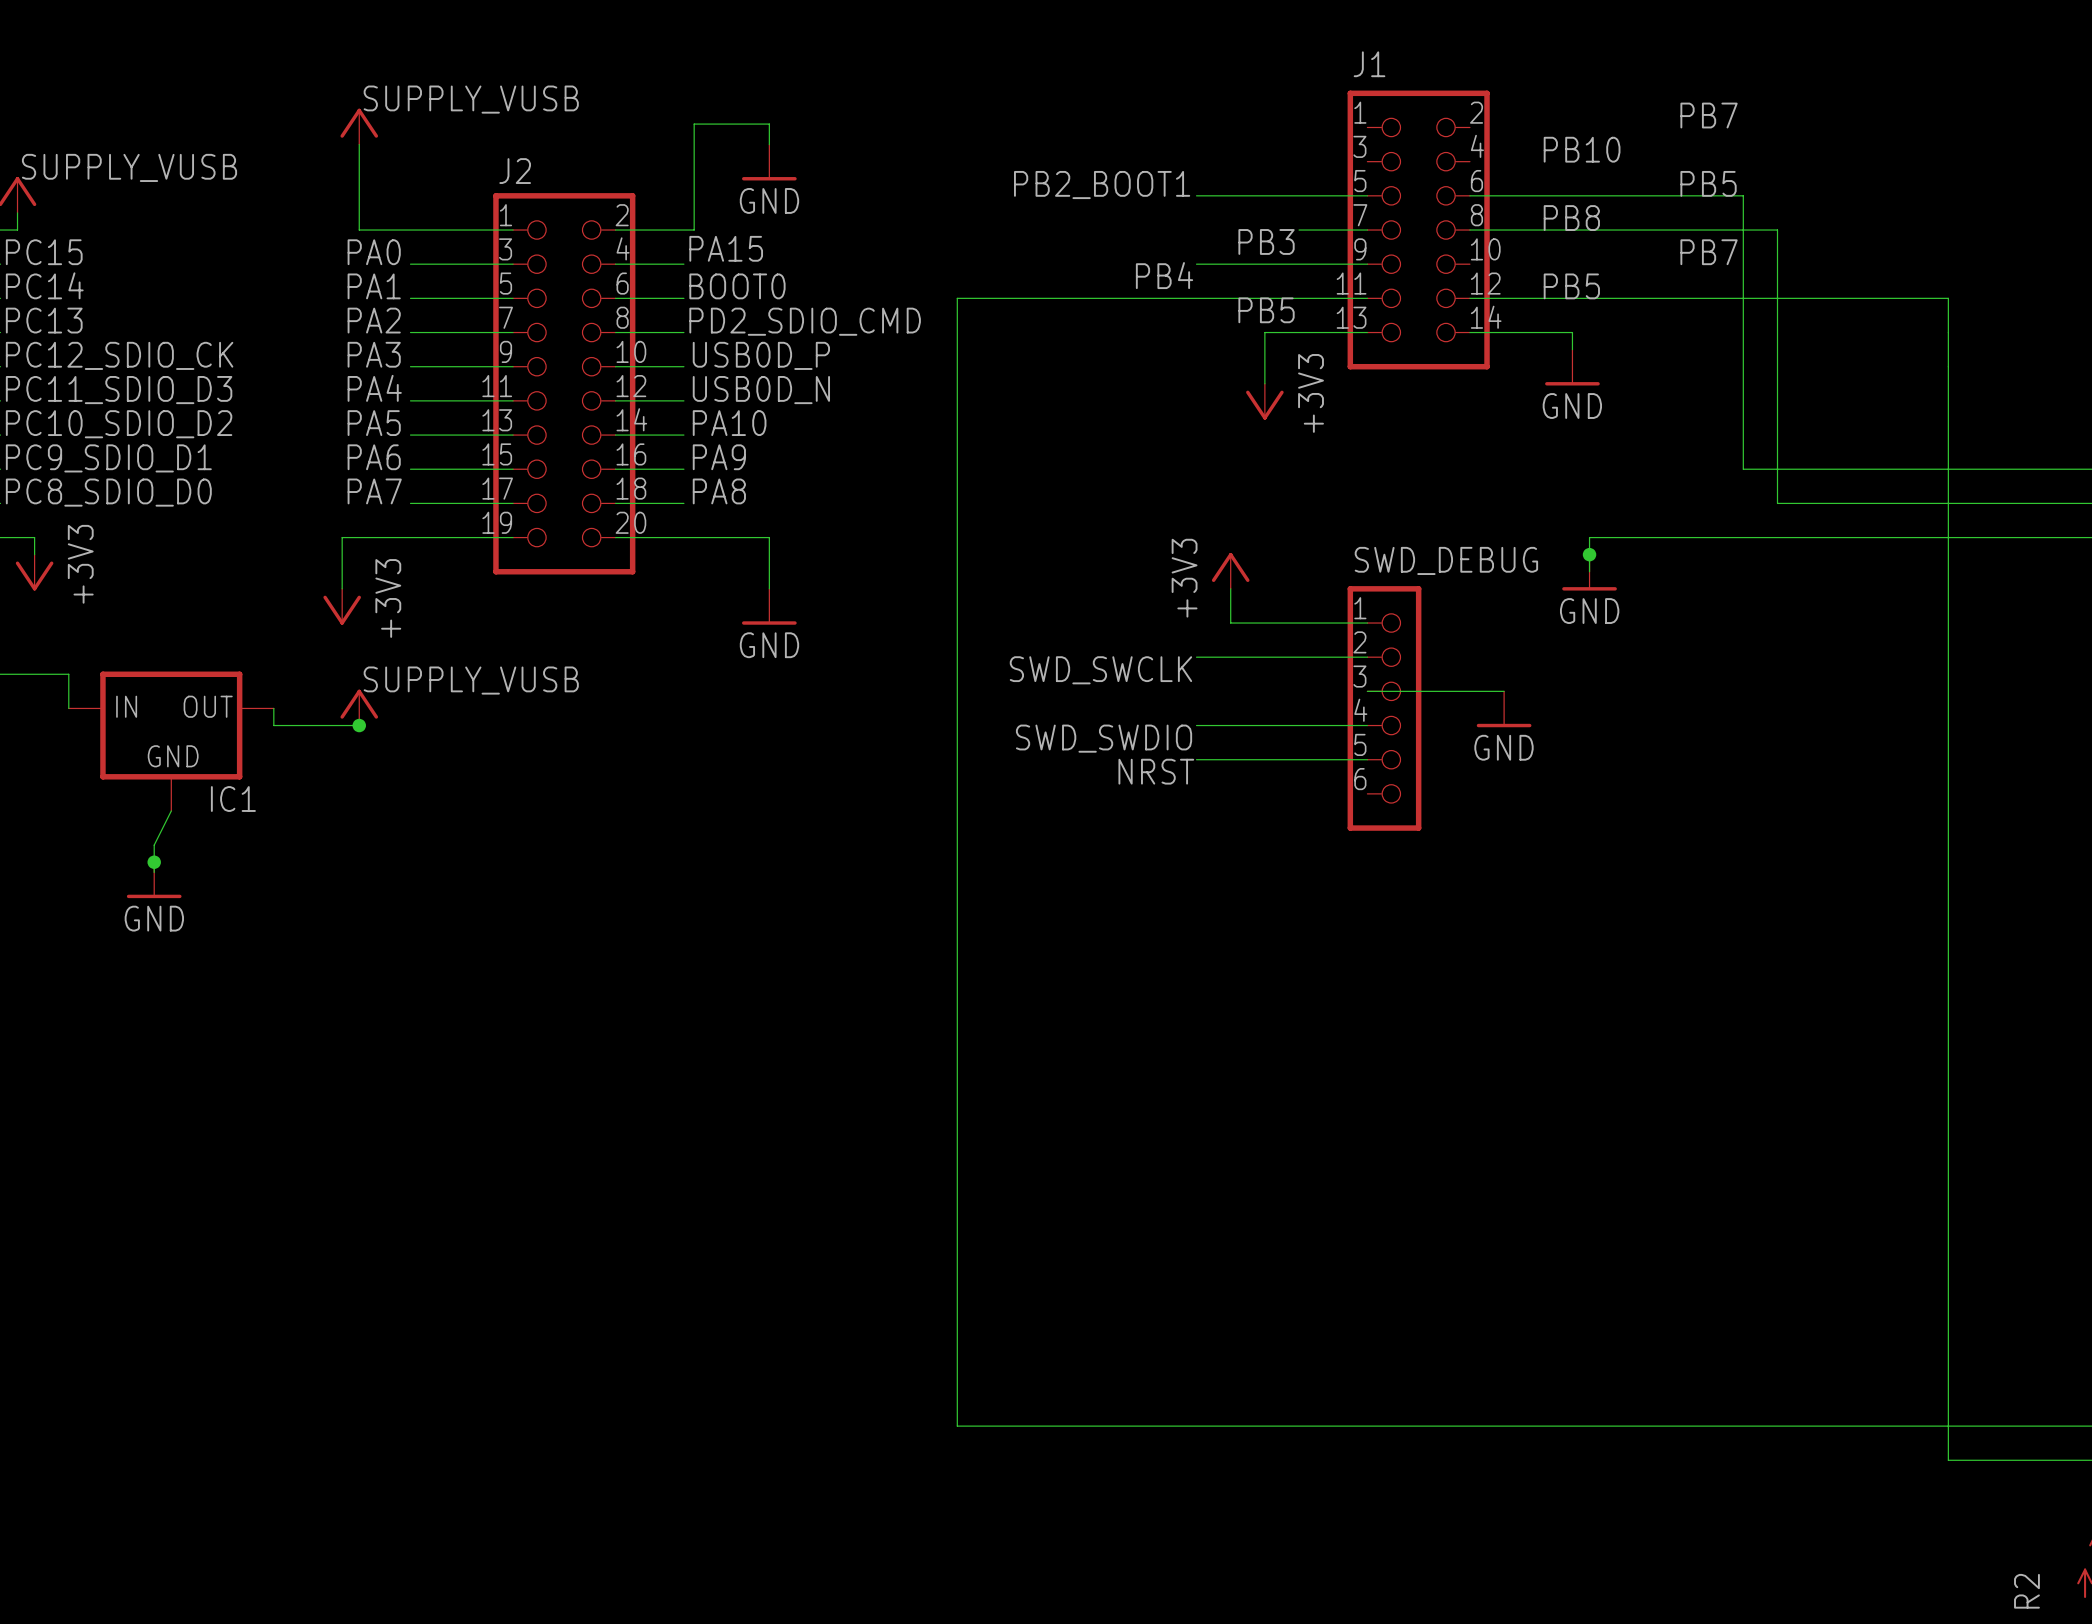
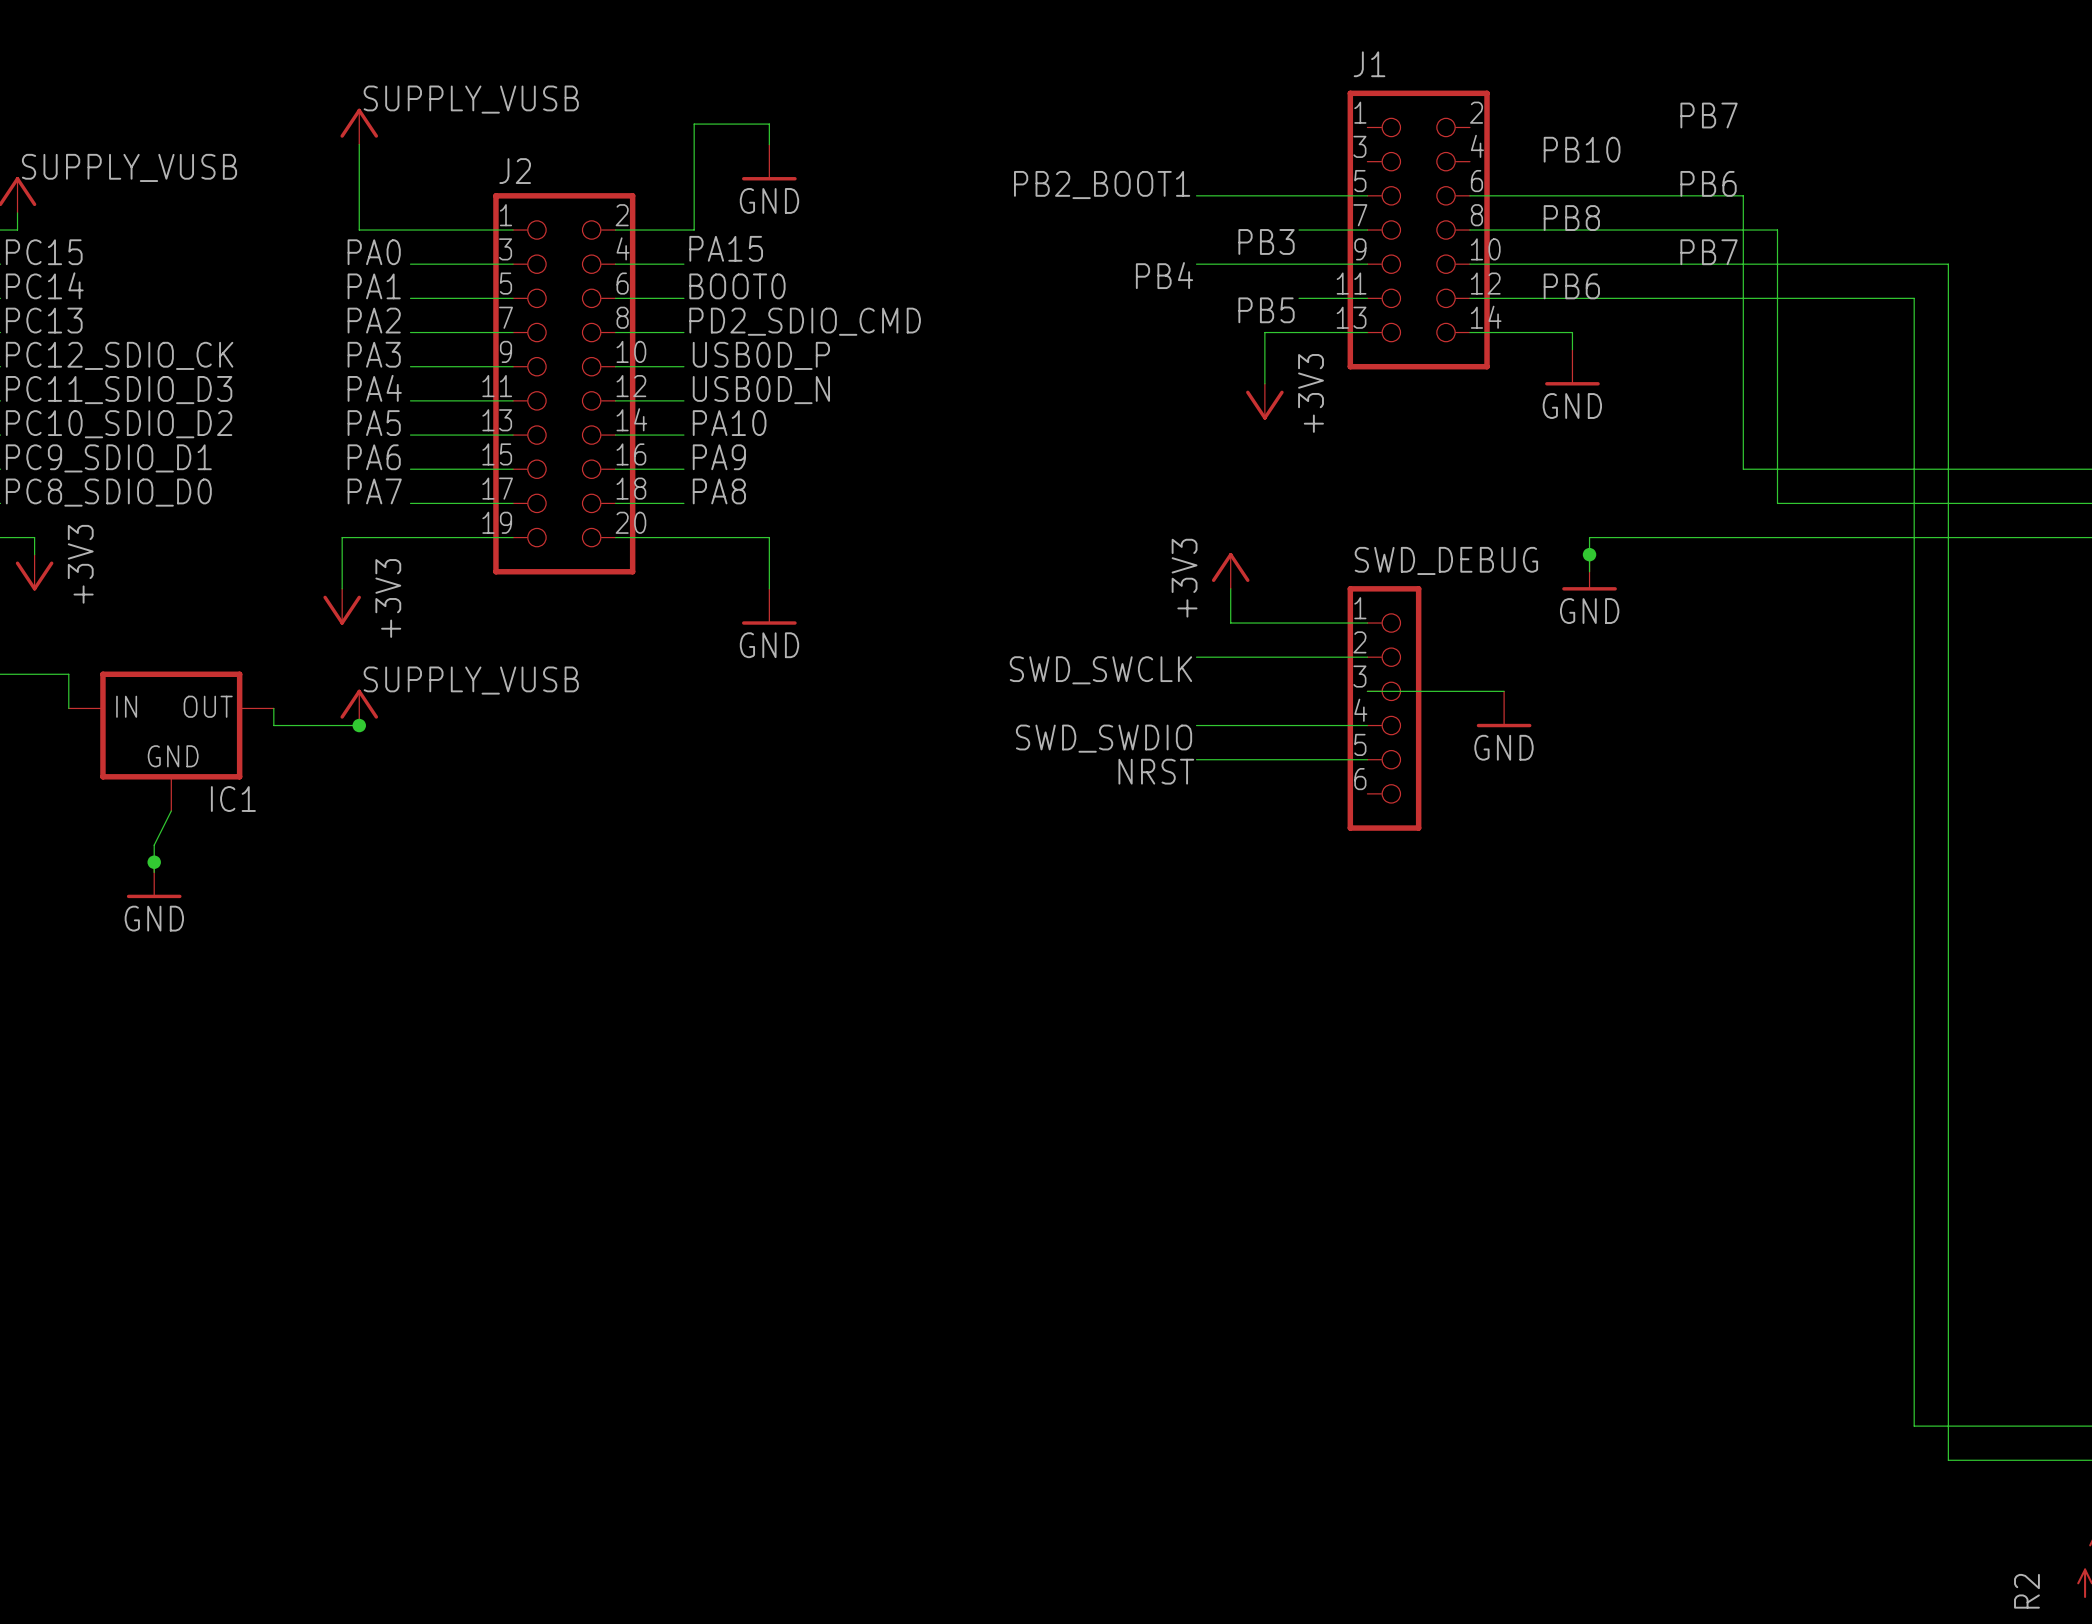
label: PB5 (1708, 183) -> PB6 (1708, 183)
label: PB5 (1571, 286) -> PB6 (1571, 286)
wire: (1299, 298) (957, 298) (957, 1426) (1914, 1426) -> (1914, 298) (1914, 1426)
wire: (1914, 298) (1948, 298) -> (1469, 264) (1948, 264) (1948, 298)

